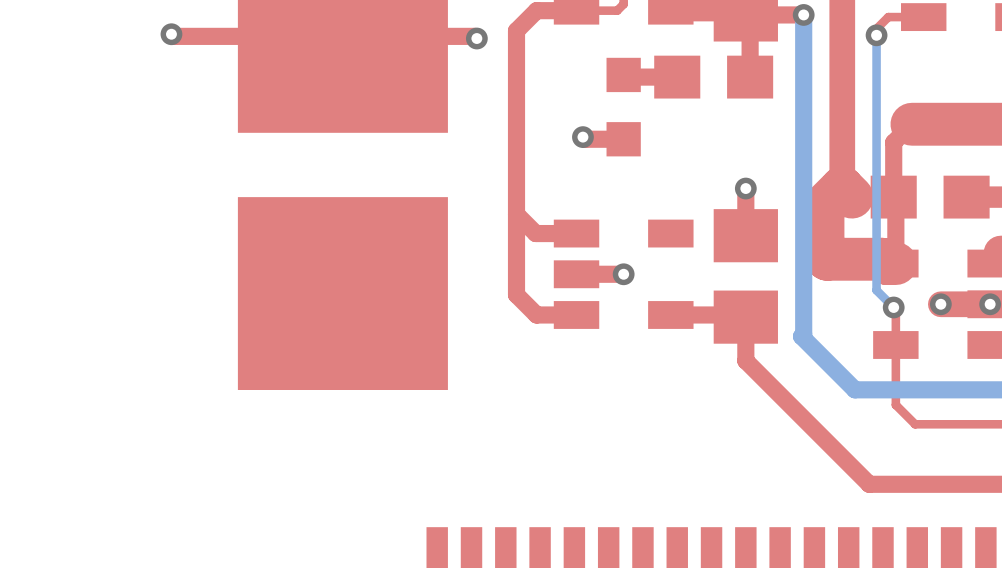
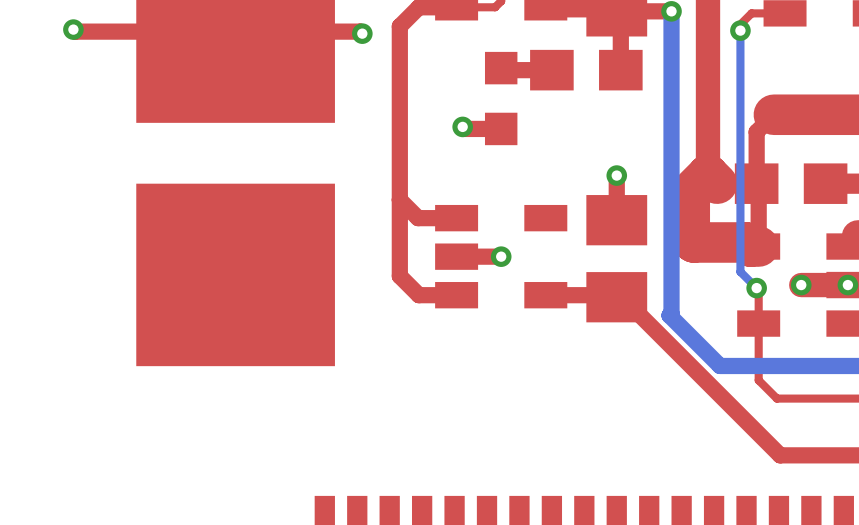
top track: (745, 317) (745, 360) (869, 484) (918, 484) -> (616, 297) (622, 297) (780, 455)

